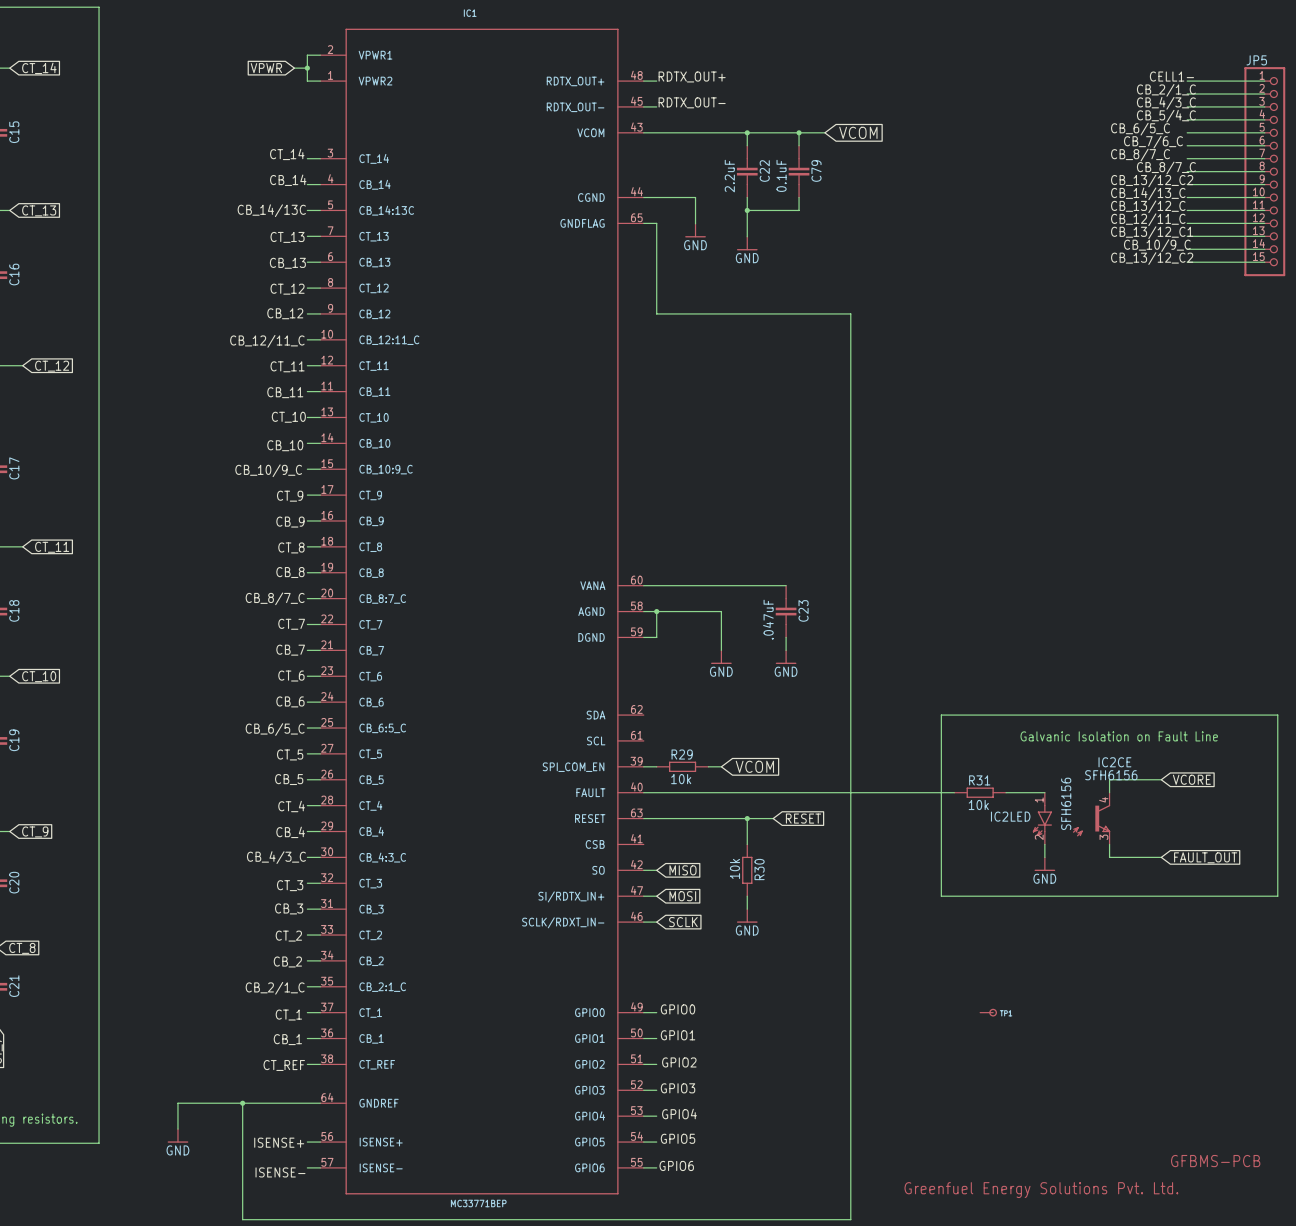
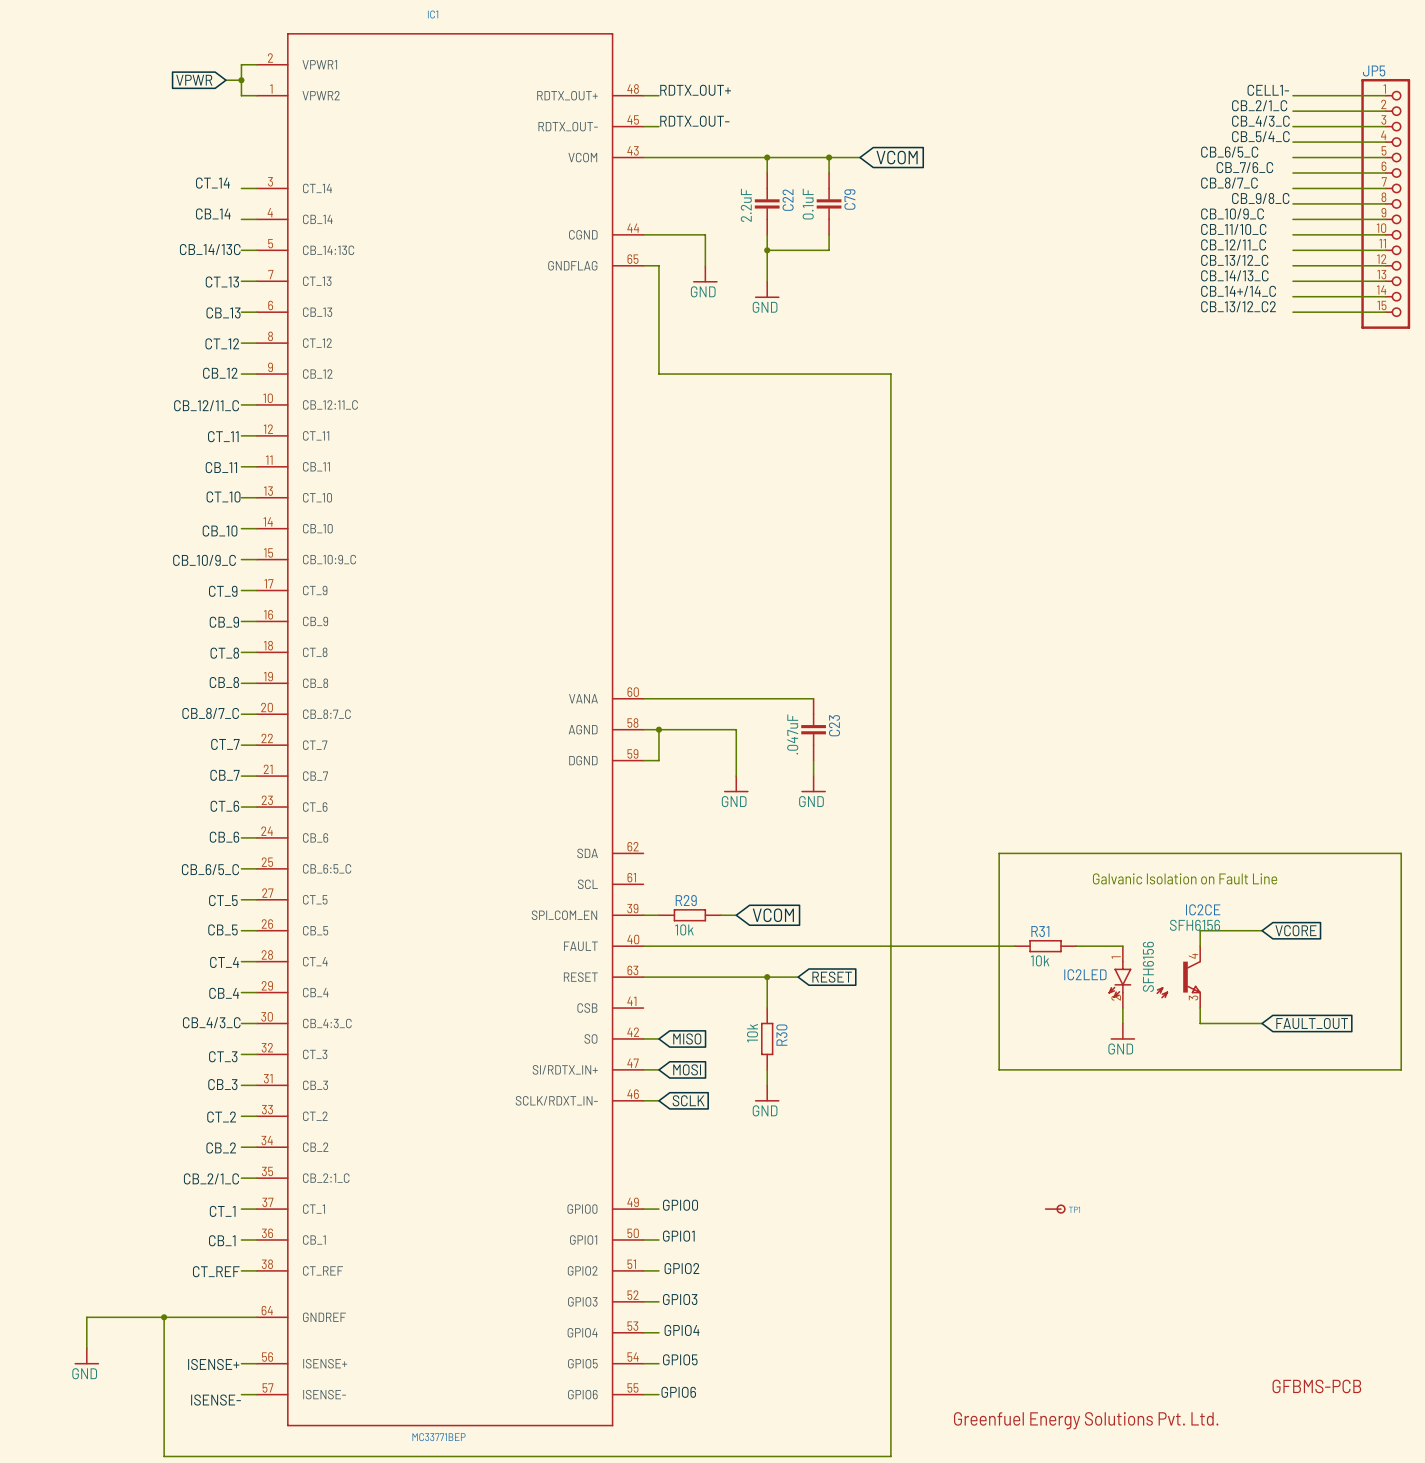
label: CB_8/7_C (1166, 167) -> CB_9/8_C (1260, 198)
label: CB_13/12_C2 (1152, 180) -> CB_10/9_C (1232, 213)
label: CB_14/13_C (1148, 193) -> CB_11/10_C (1233, 229)
label: CB_13/12_C (1148, 206) -> CB_12/11_C (1233, 244)
label: CB_12/11_C (1148, 219) -> CB_13/12_C (1234, 260)
label: CB_13/12_C1 (1152, 232) -> CB_14/13_C (1234, 275)
label: CB_10/9_C (1157, 245) -> CB_14+/14_C (1238, 291)

